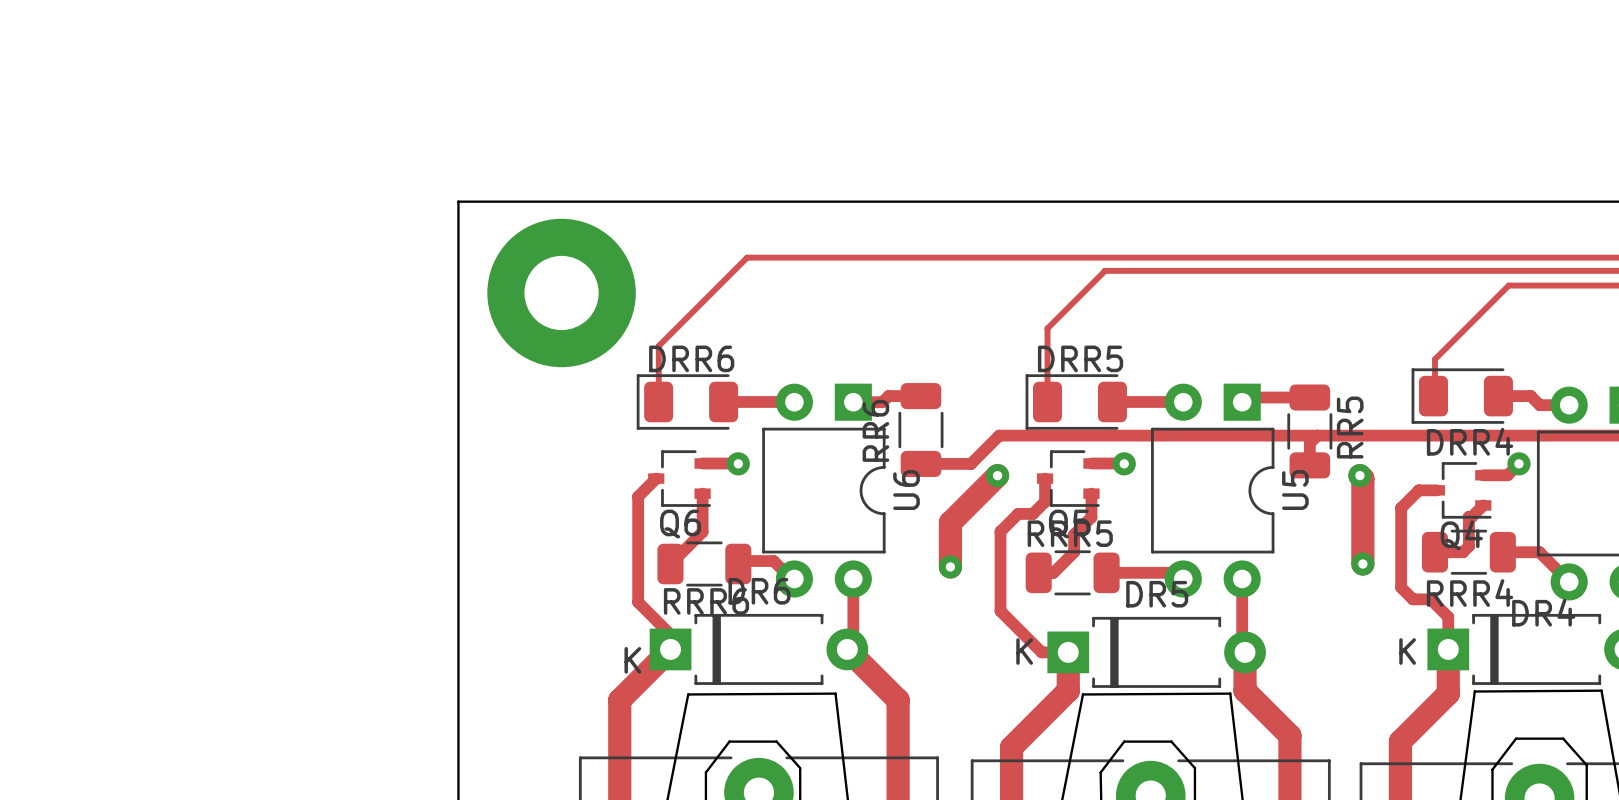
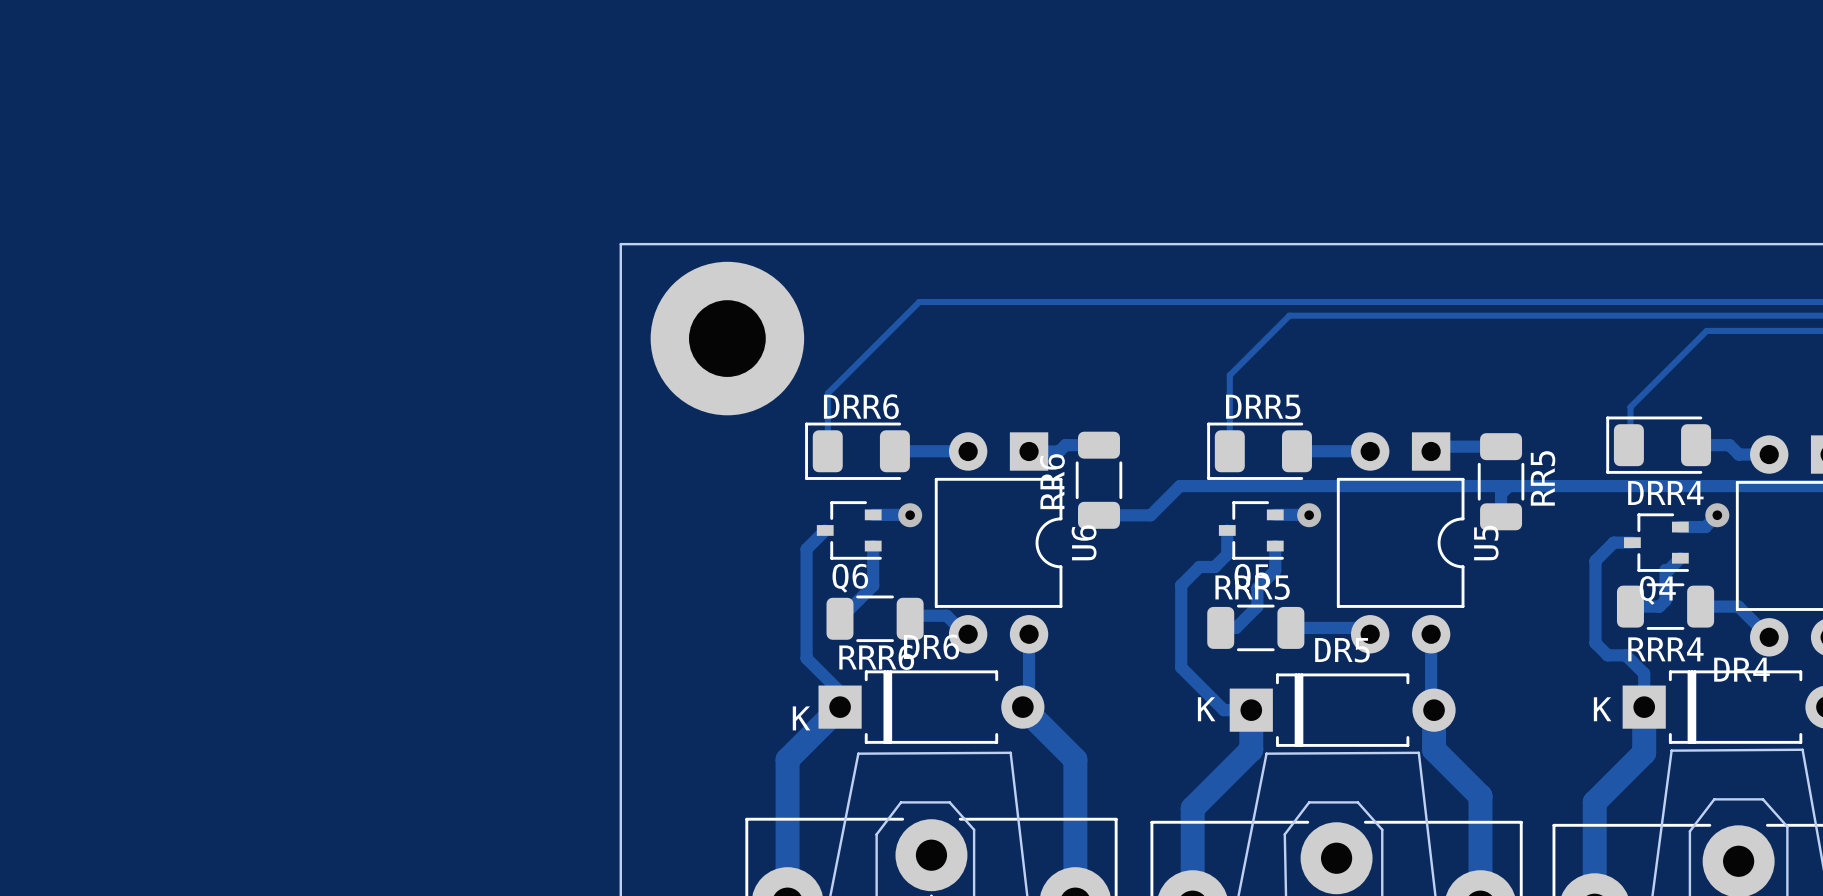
track: (997, 475) (950, 522) (950, 566) -> none
via: (997, 475) -> none
track: (1359, 475) (1362, 478) (1362, 564) -> none
via: (1359, 475) -> none
via: (1362, 564) -> none
via: (950, 566) -> none

